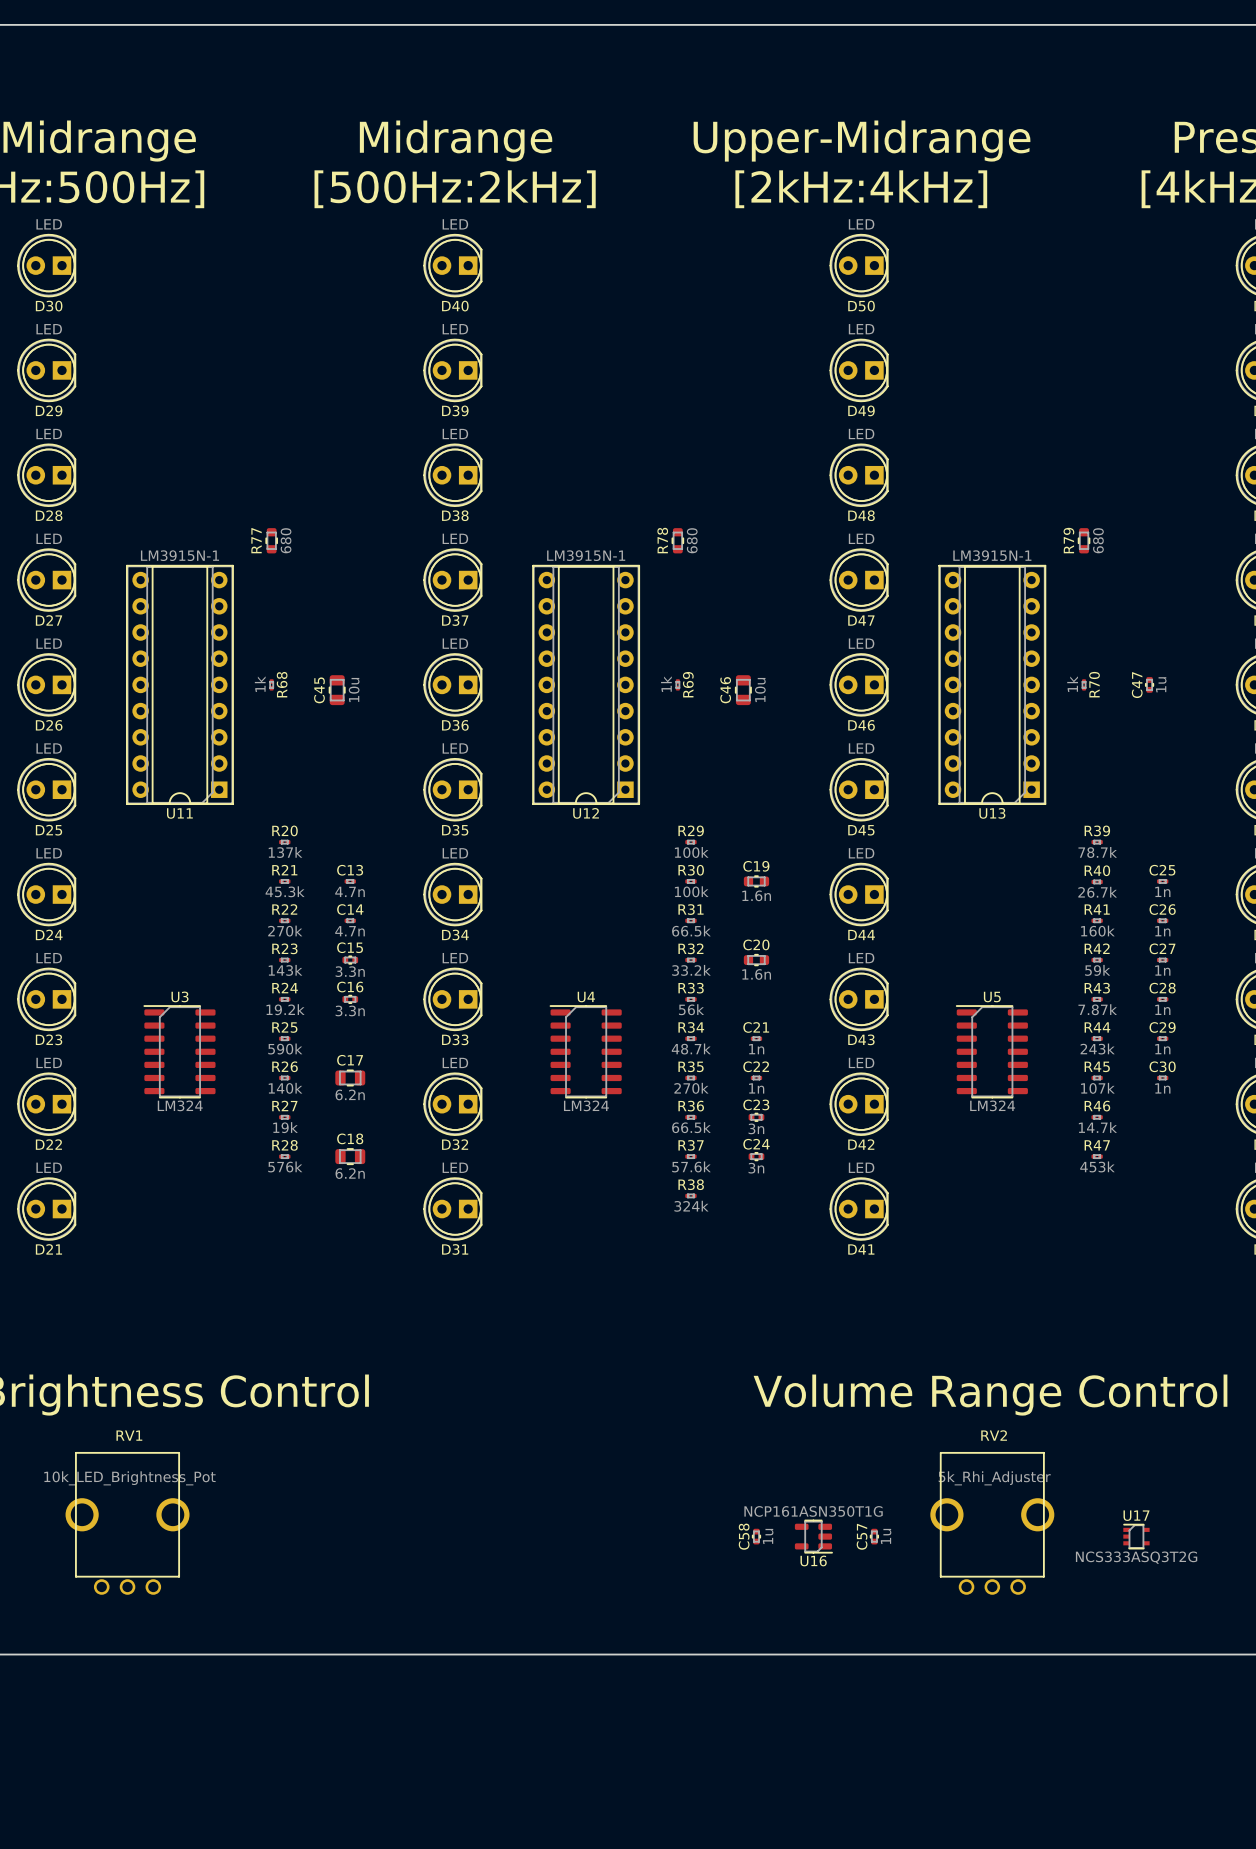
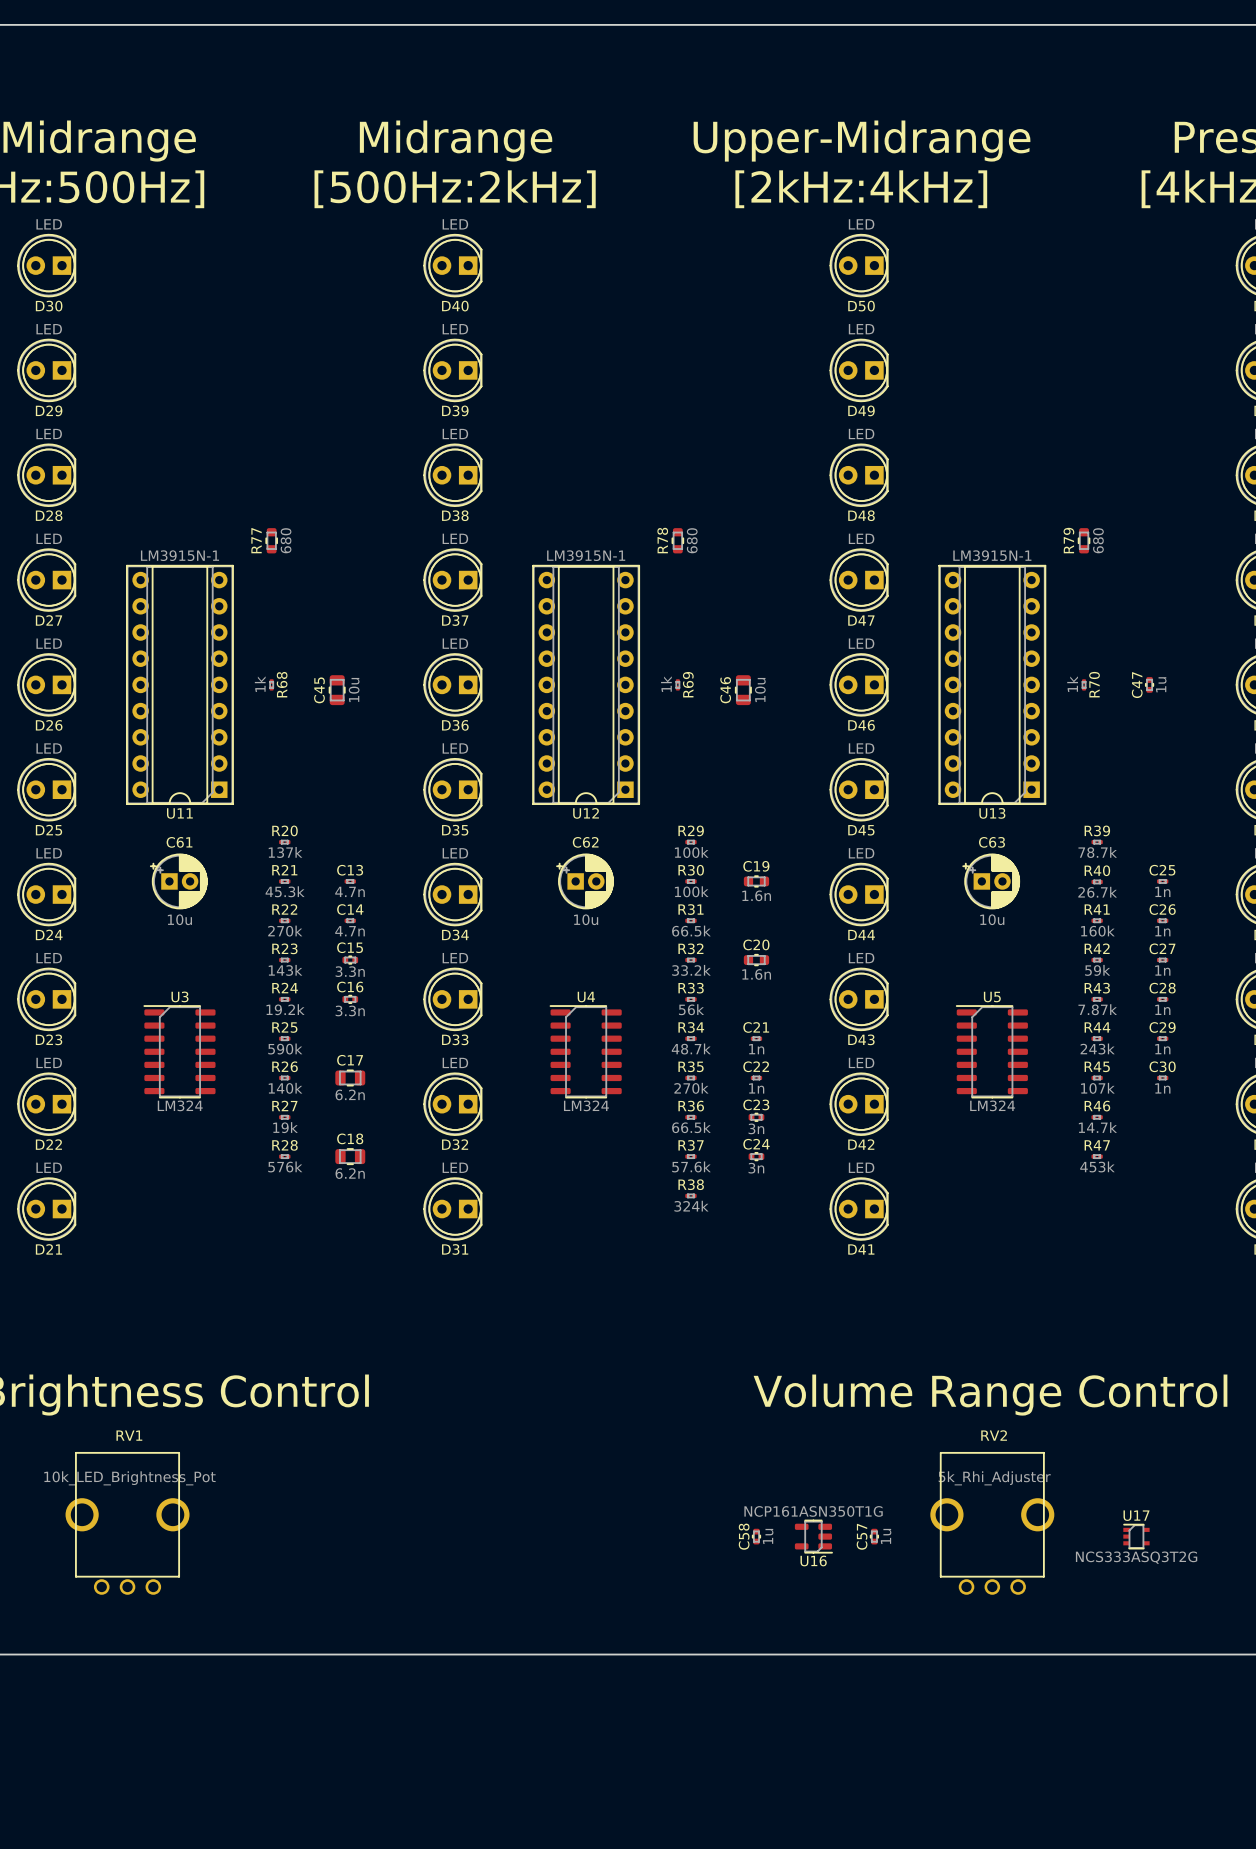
C61: none -> 10u (178, 881)
C62: none -> 10u (585, 881)
C63: none -> 10u (991, 881)

